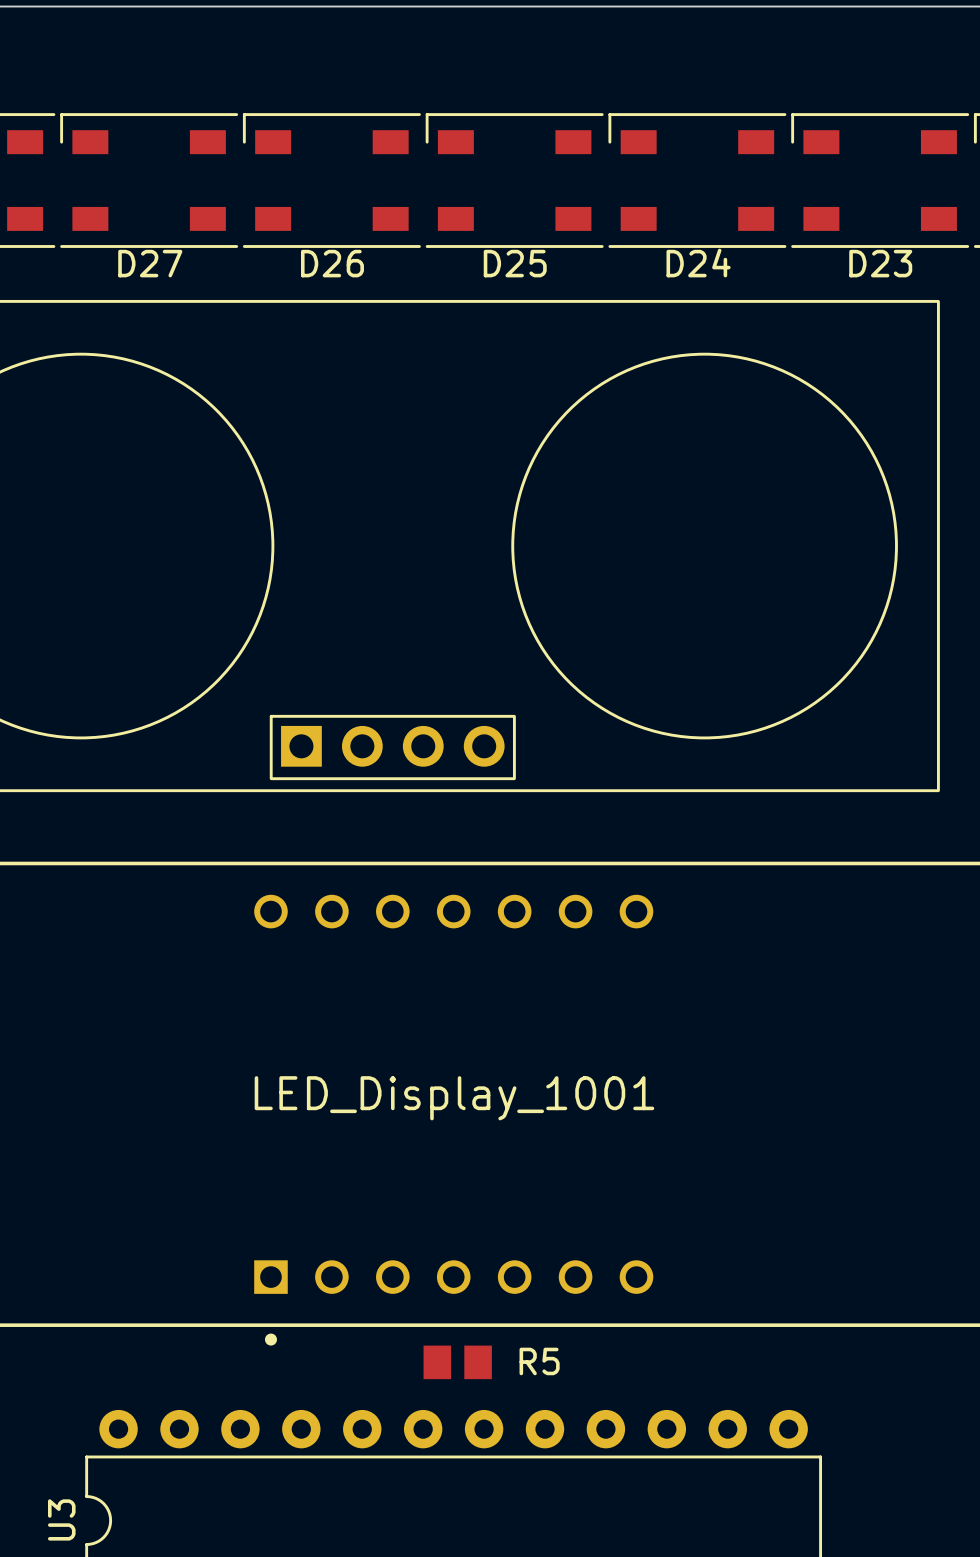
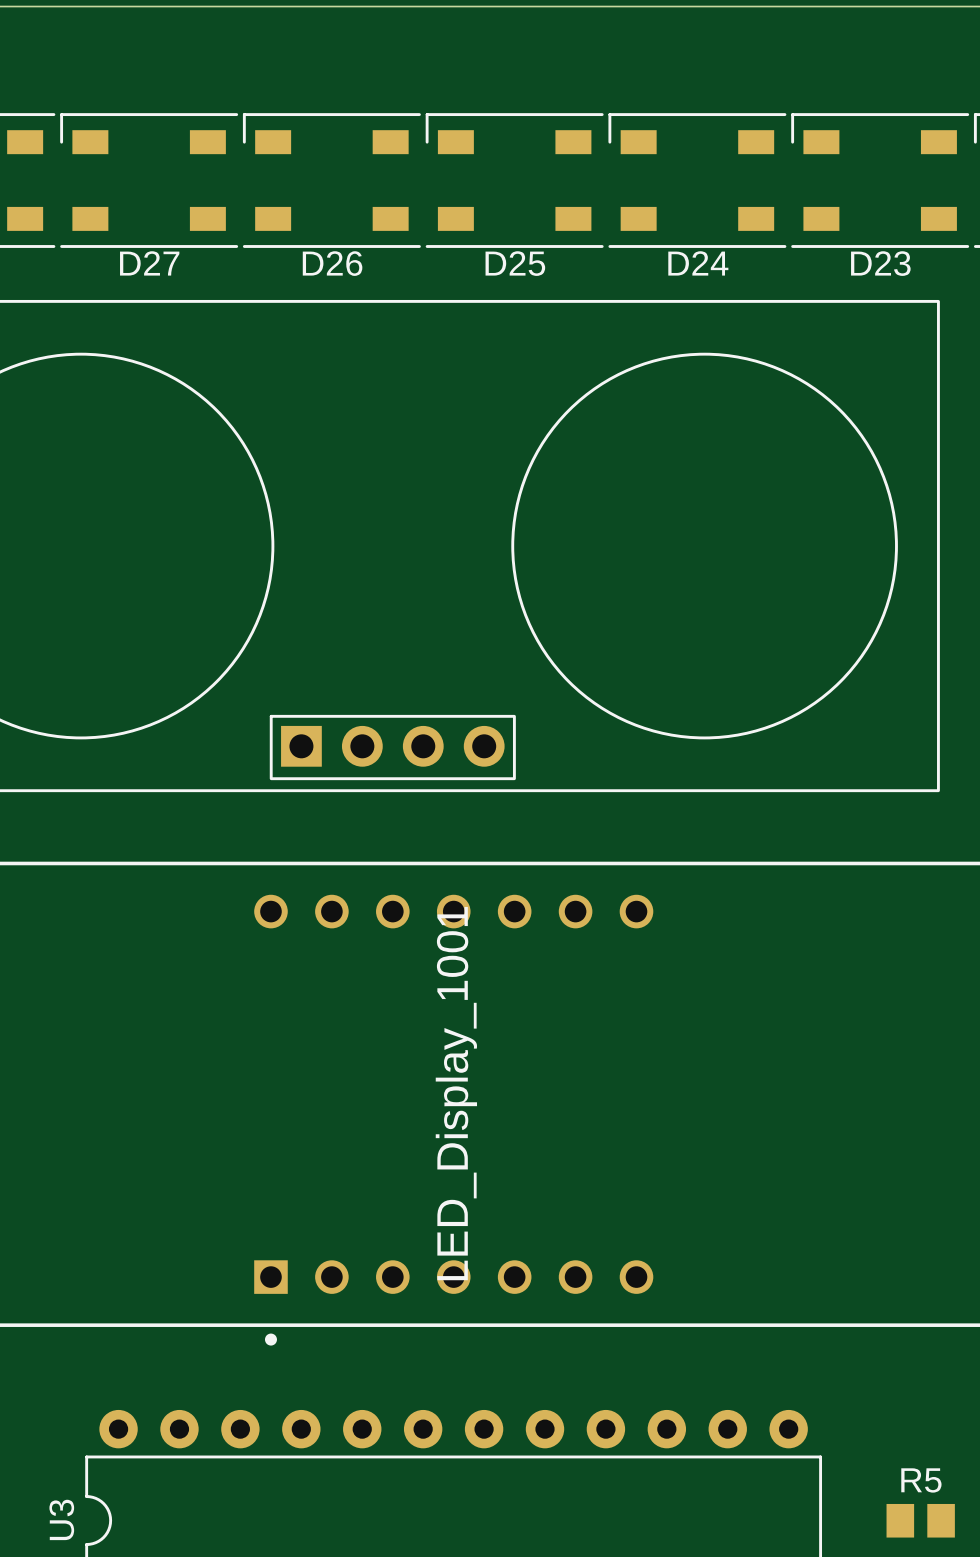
part value rotation: 0° (454, 1098) -> 90° counterclockwise (456, 1093)
R5 name position: R5 (539, 1361) -> R5 (921, 1480)
R5 position: (457, 1362) -> (920, 1520)

